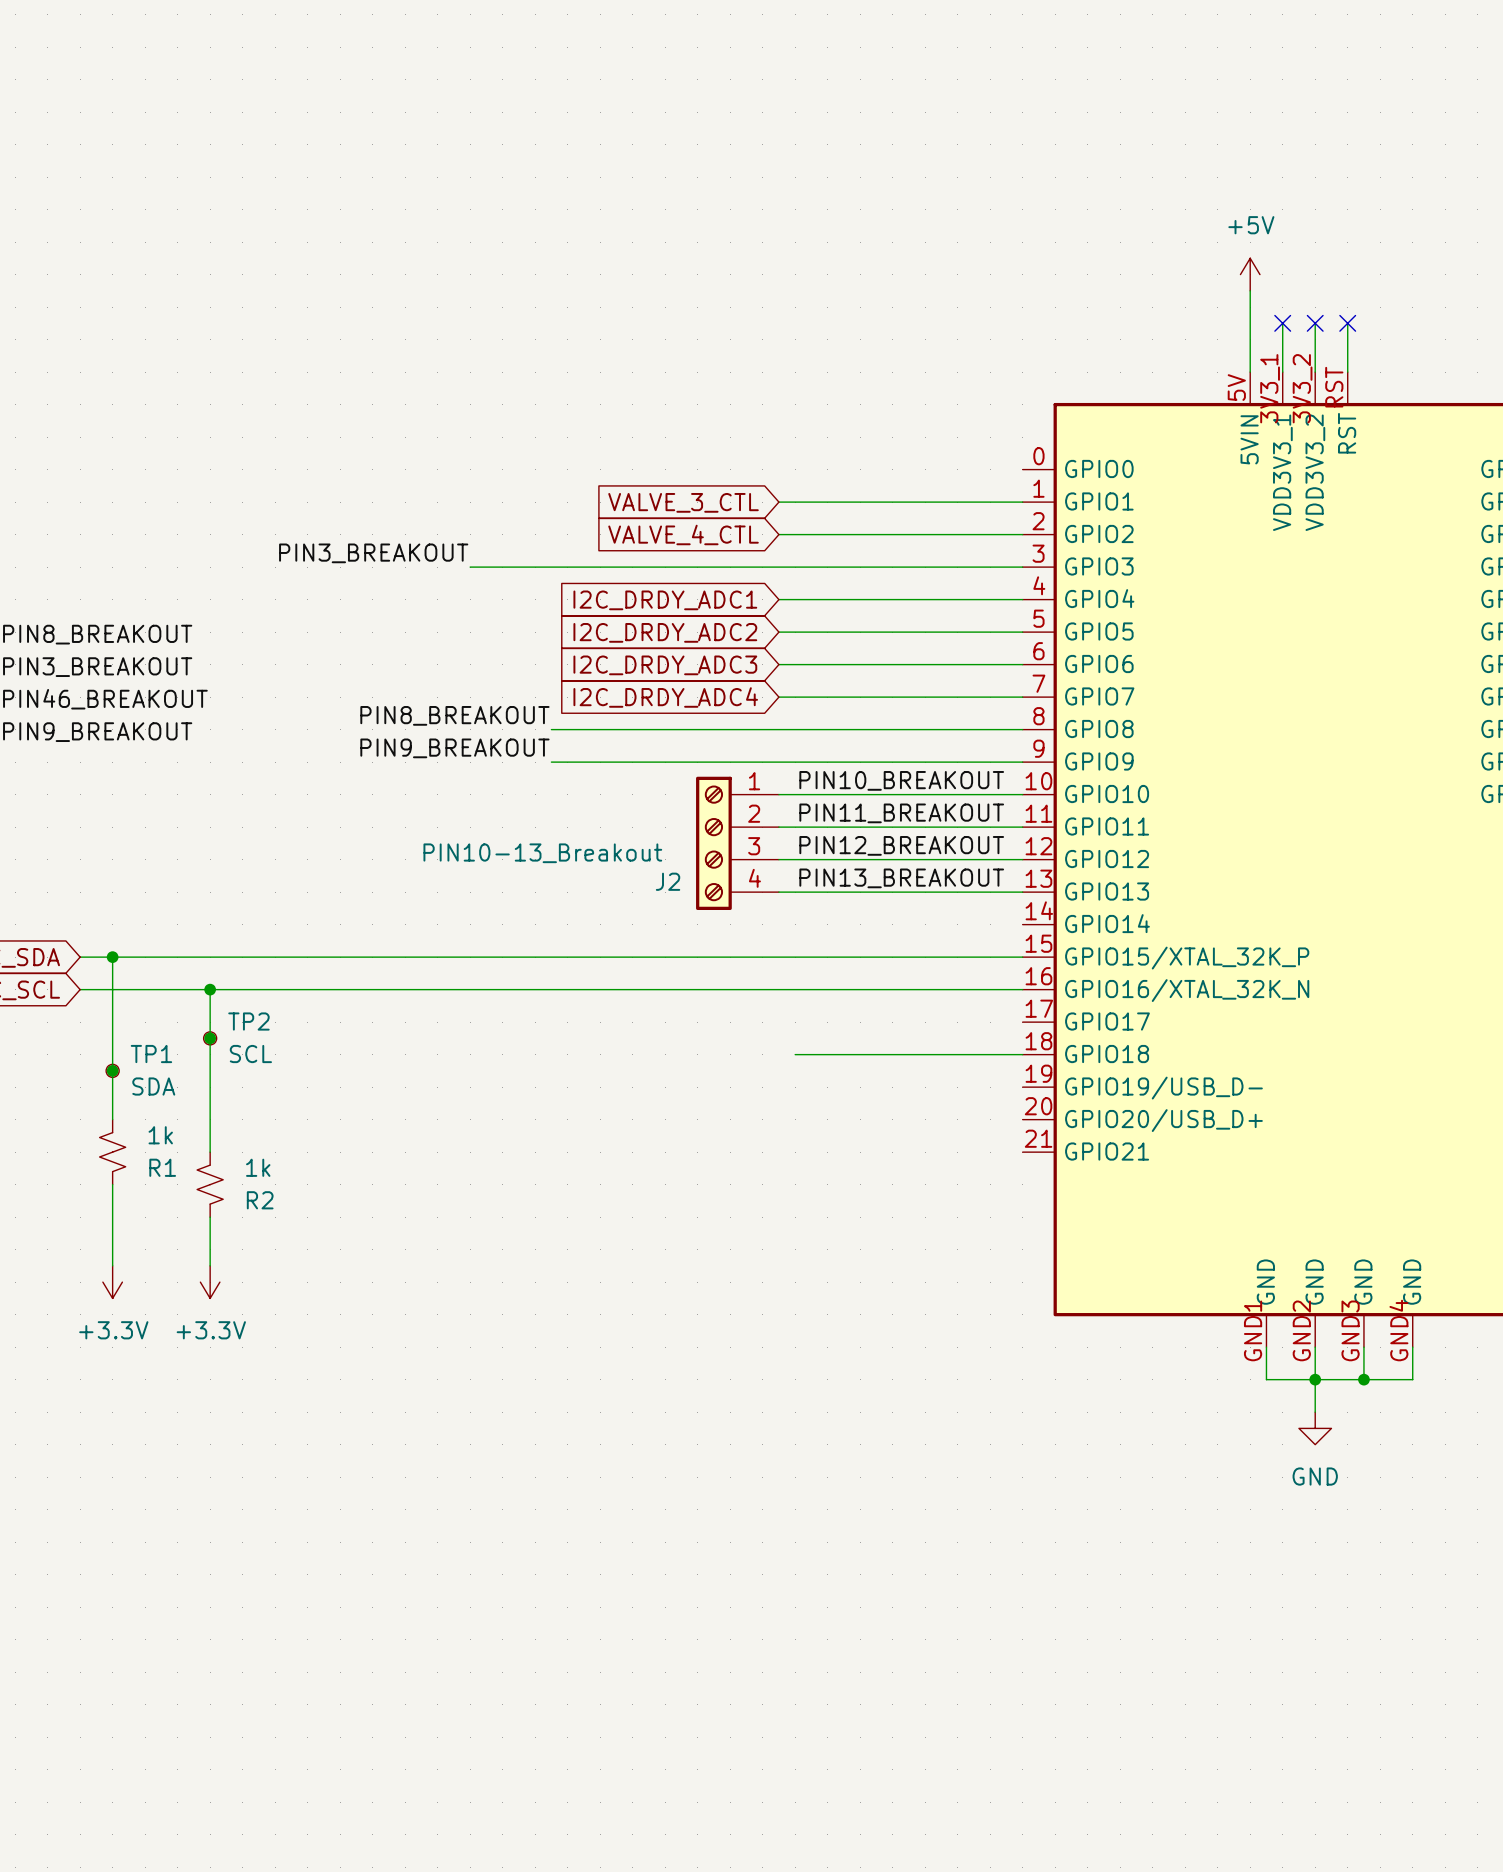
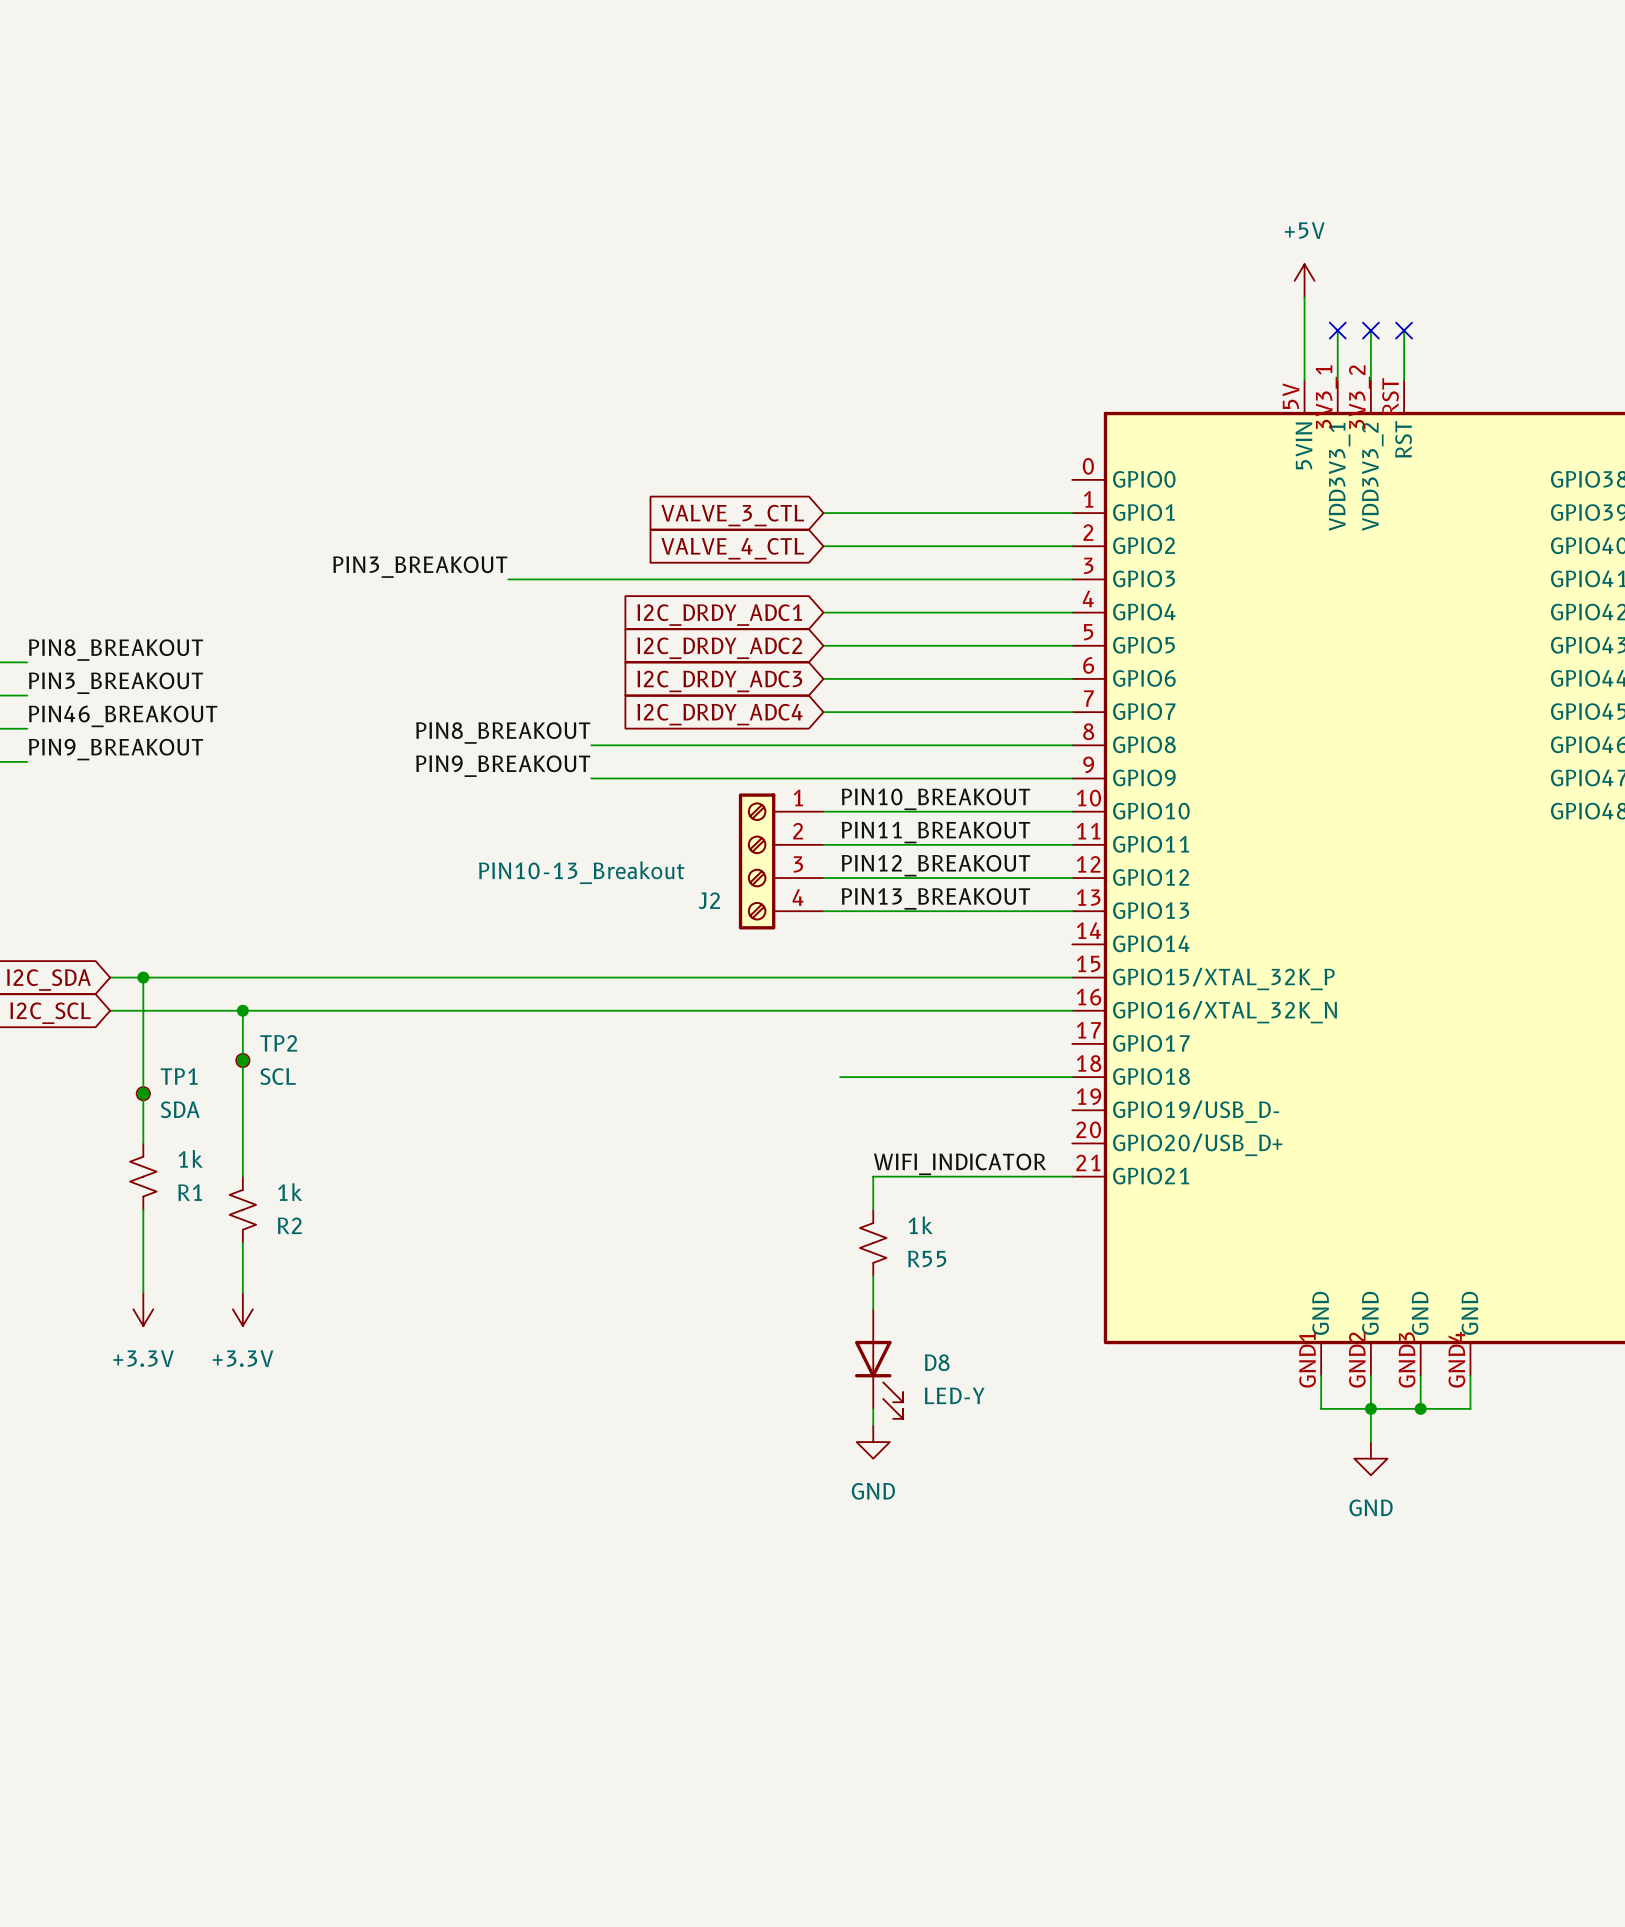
label: none -> WIFI_INDICATOR (960, 1164)
wire: none -> (1072, 1176) (873, 1176) (873, 1209)
R55: none -> 1k (873, 1242)
wire: none -> (873, 1276) (873, 1309)
D8: none -> LED-Y (879, 1364)
wire: none -> (873, 1408) (873, 1425)
power symbol: none -> GND (873, 1442)

